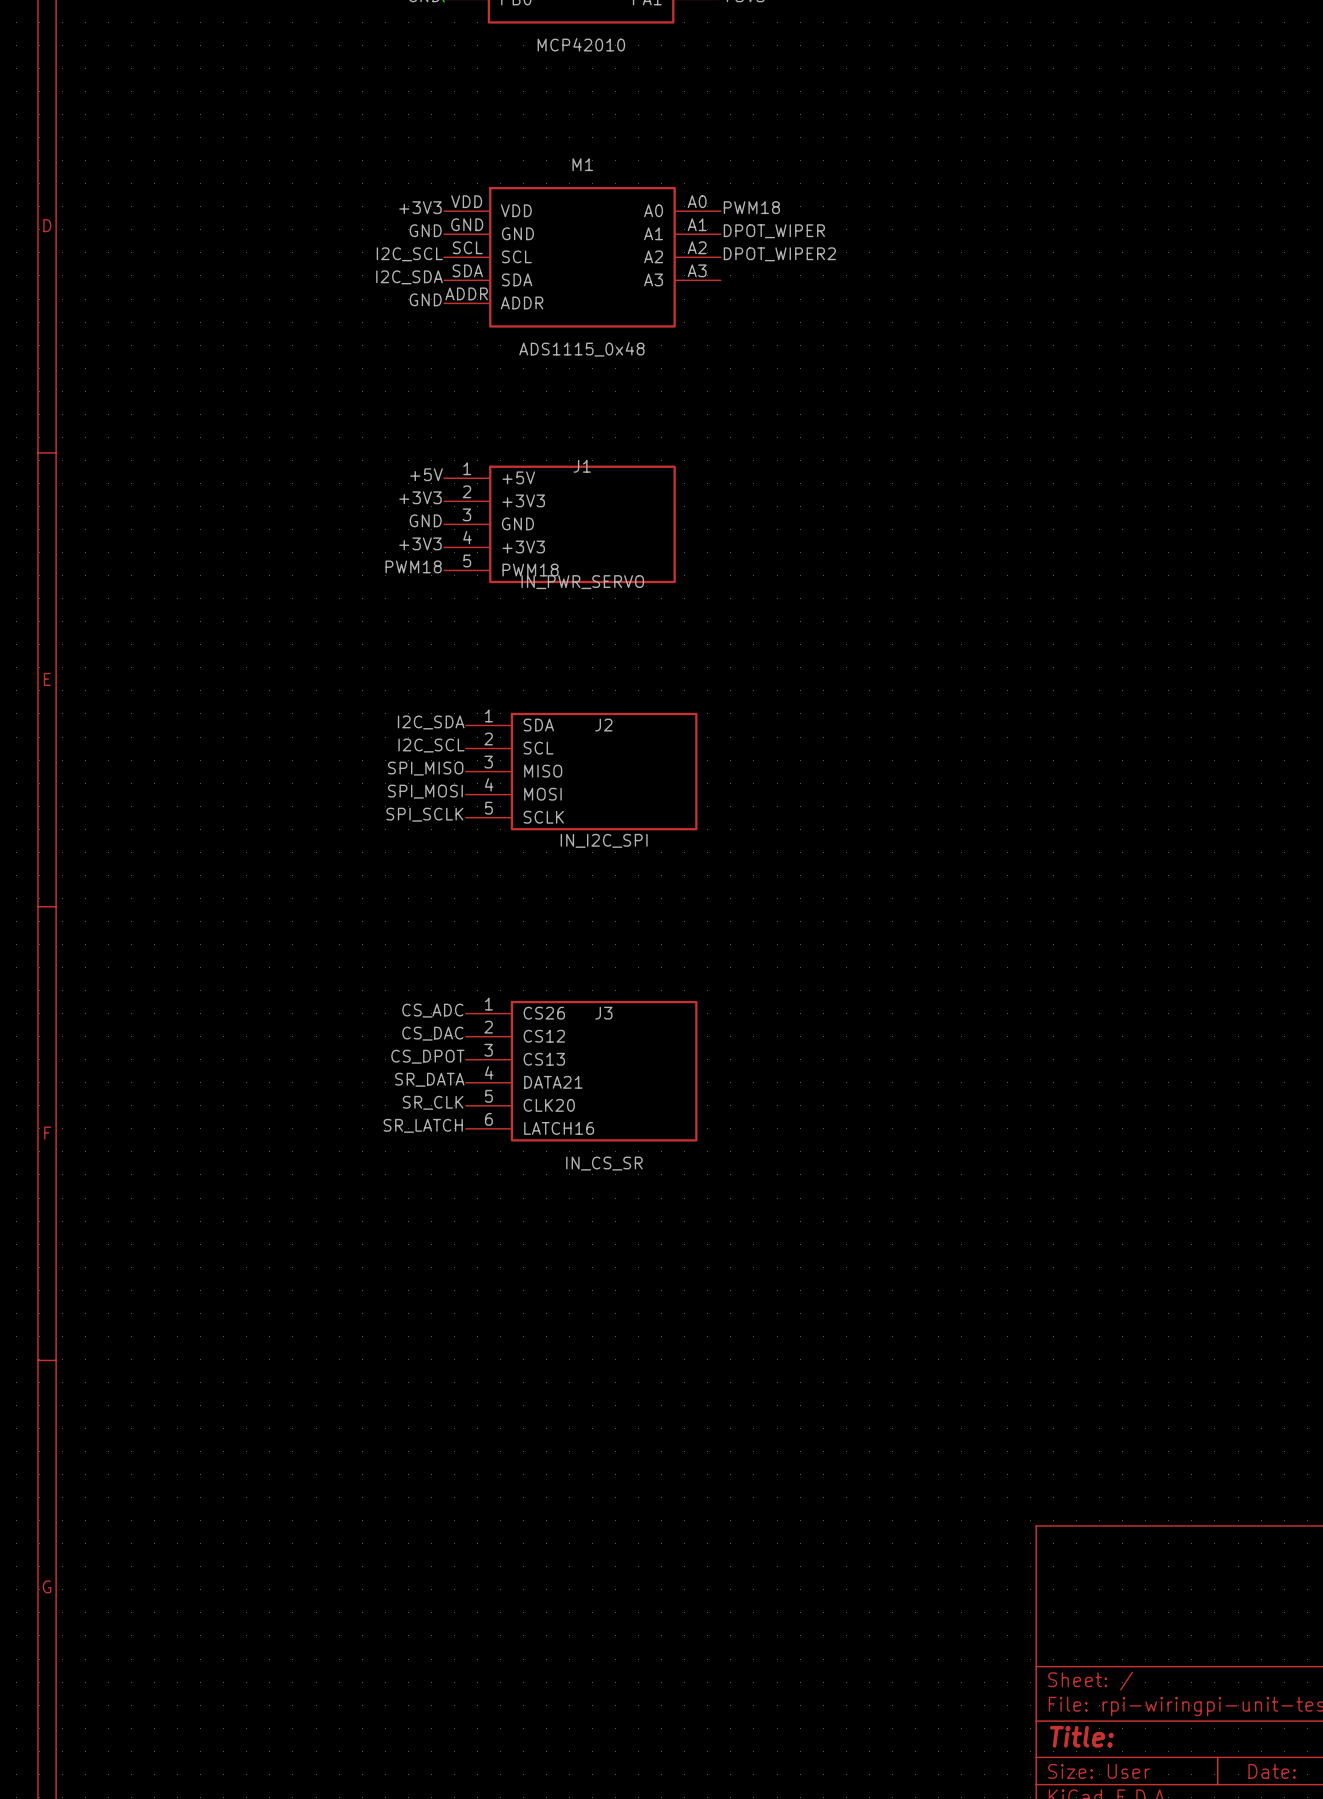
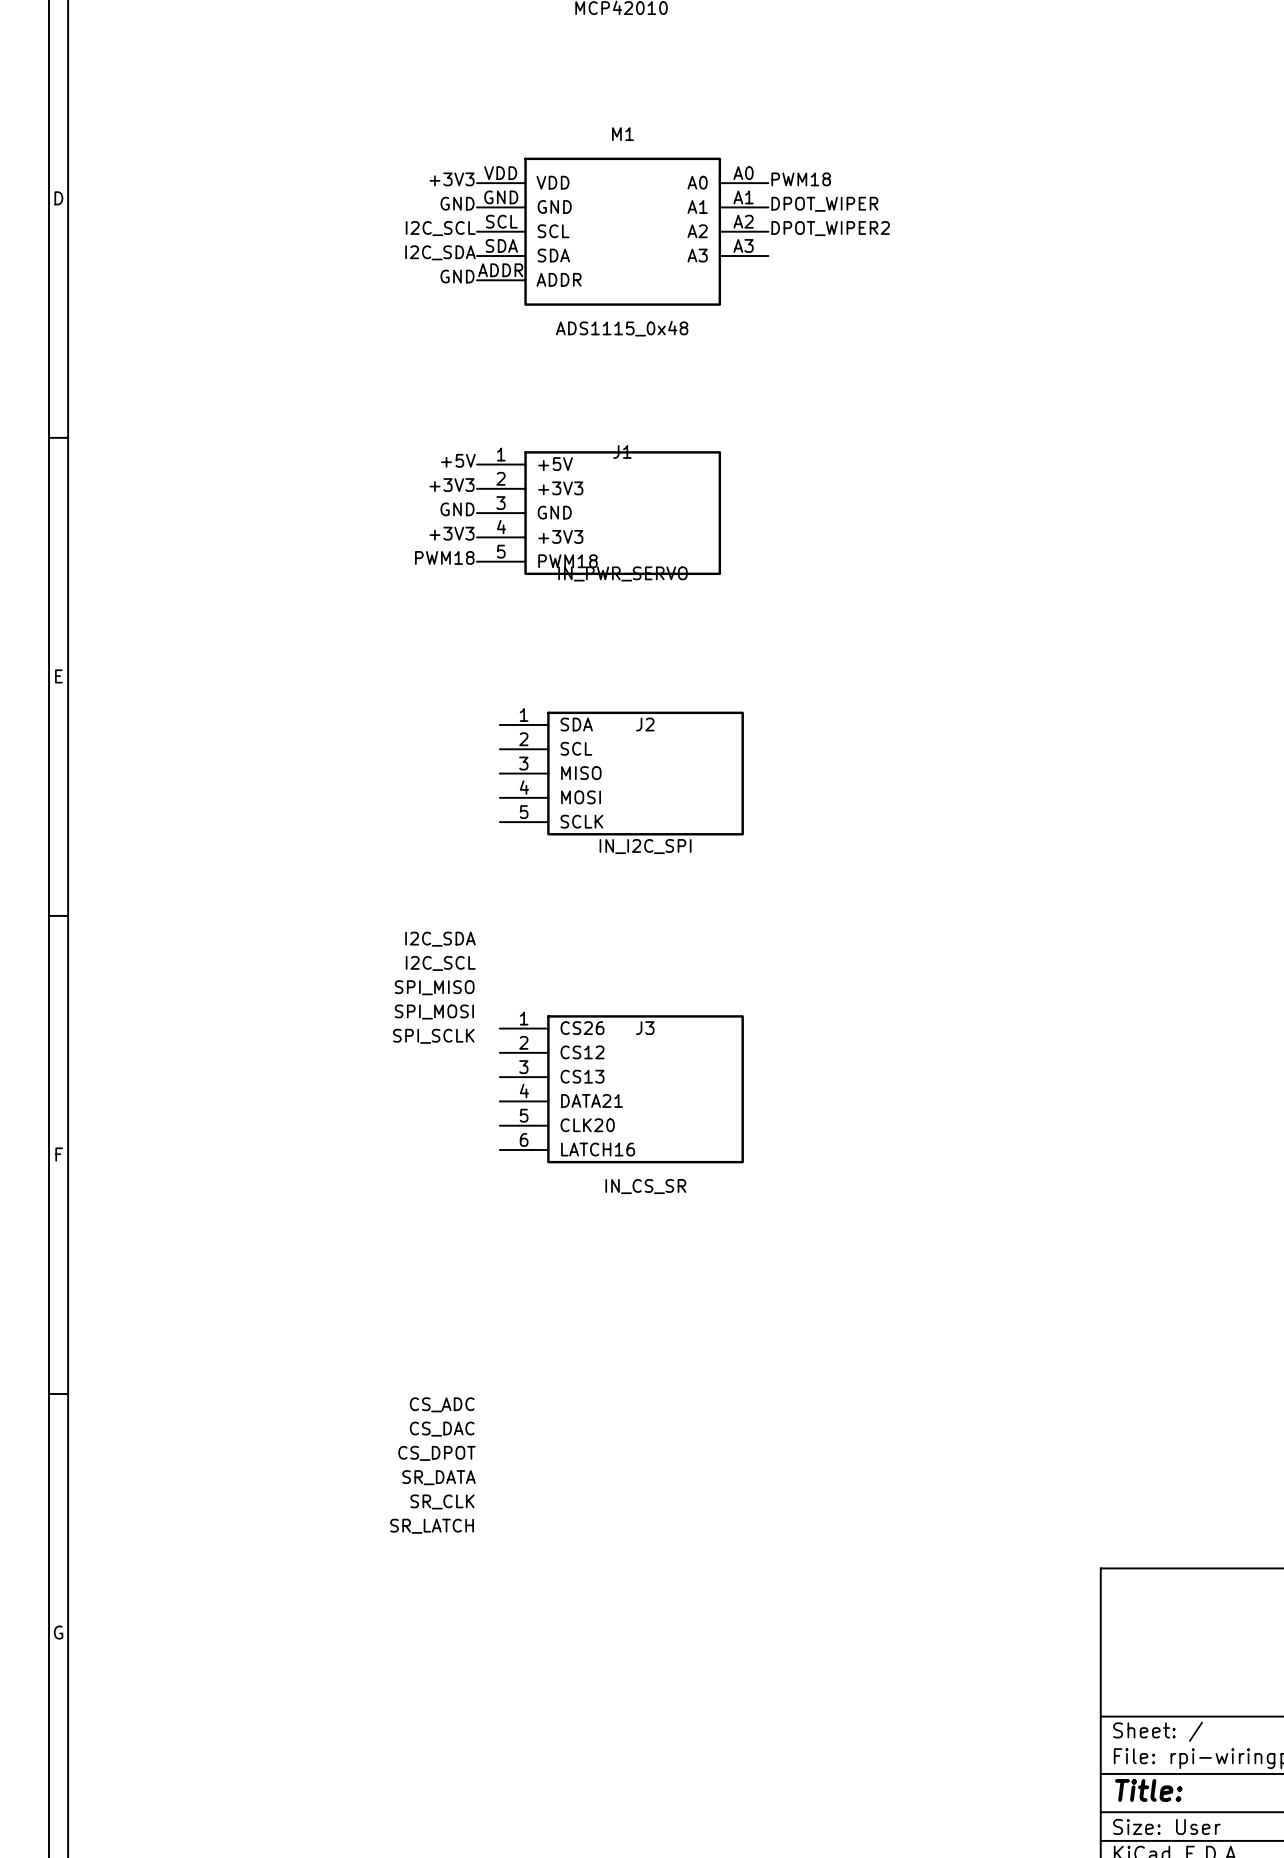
label position: I2C_SDA (431, 722) -> I2C_SDA (440, 939)
label position: I2C_SCL (431, 745) -> I2C_SCL (440, 963)
label position: SPI_MISO (425, 768) -> SPI_MISO (434, 987)
label position: SPI_MOSI (425, 791) -> SPI_MOSI (434, 1012)
label position: SPI_SCLK (424, 814) -> SPI_SCLK (433, 1036)
label: CS_ADC (432, 1010) -> none
label: CS_DAC (432, 1033) -> none
label: CS_DPOT (427, 1056) -> none
label: SR_DATA (429, 1079) -> none
label: SR_CLK (433, 1102) -> none
label: SR_LATCH (423, 1125) -> none
label: none -> CS_ADC (442, 1404)
label: none -> CS_DAC (442, 1429)
label: none -> CS_DPOT (436, 1453)
label: none -> SR_DATA (439, 1477)
label: none -> SR_CLK (442, 1501)
label: none -> SR_LATCH (432, 1526)

